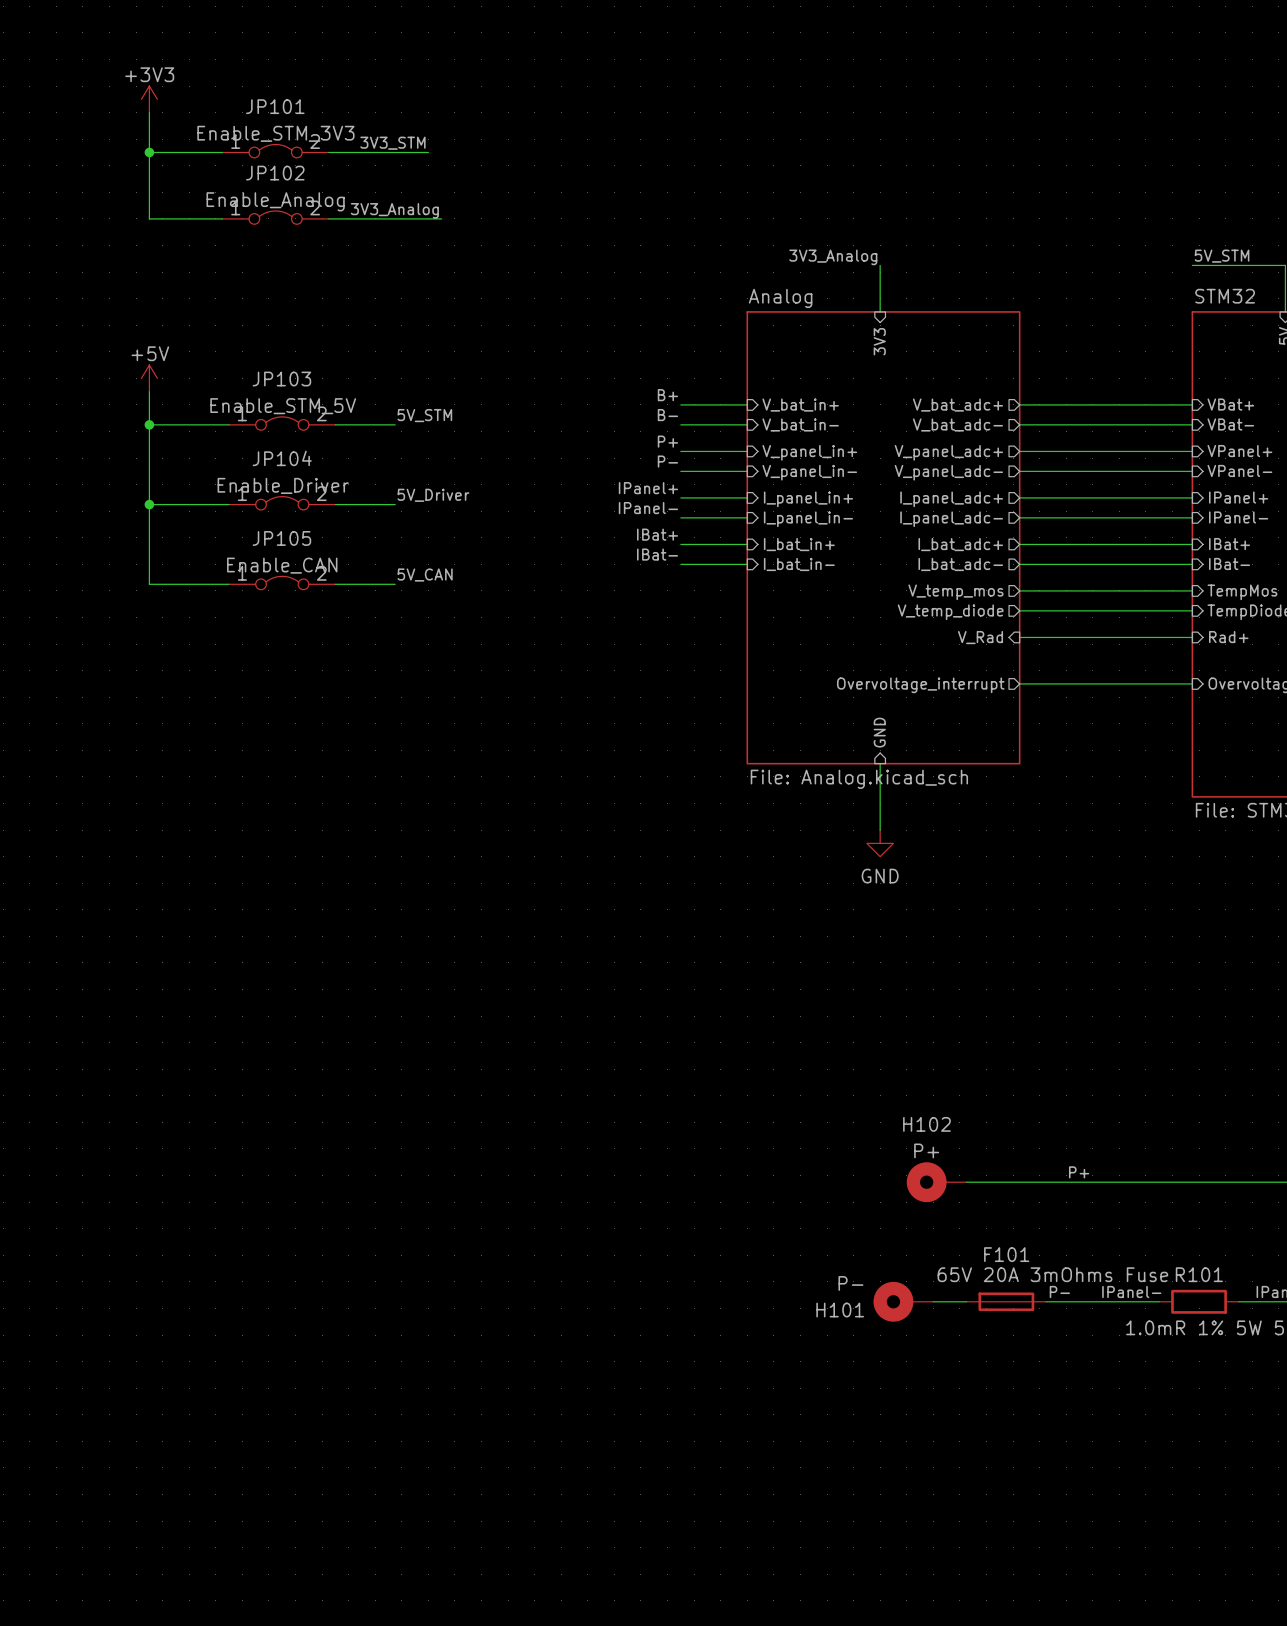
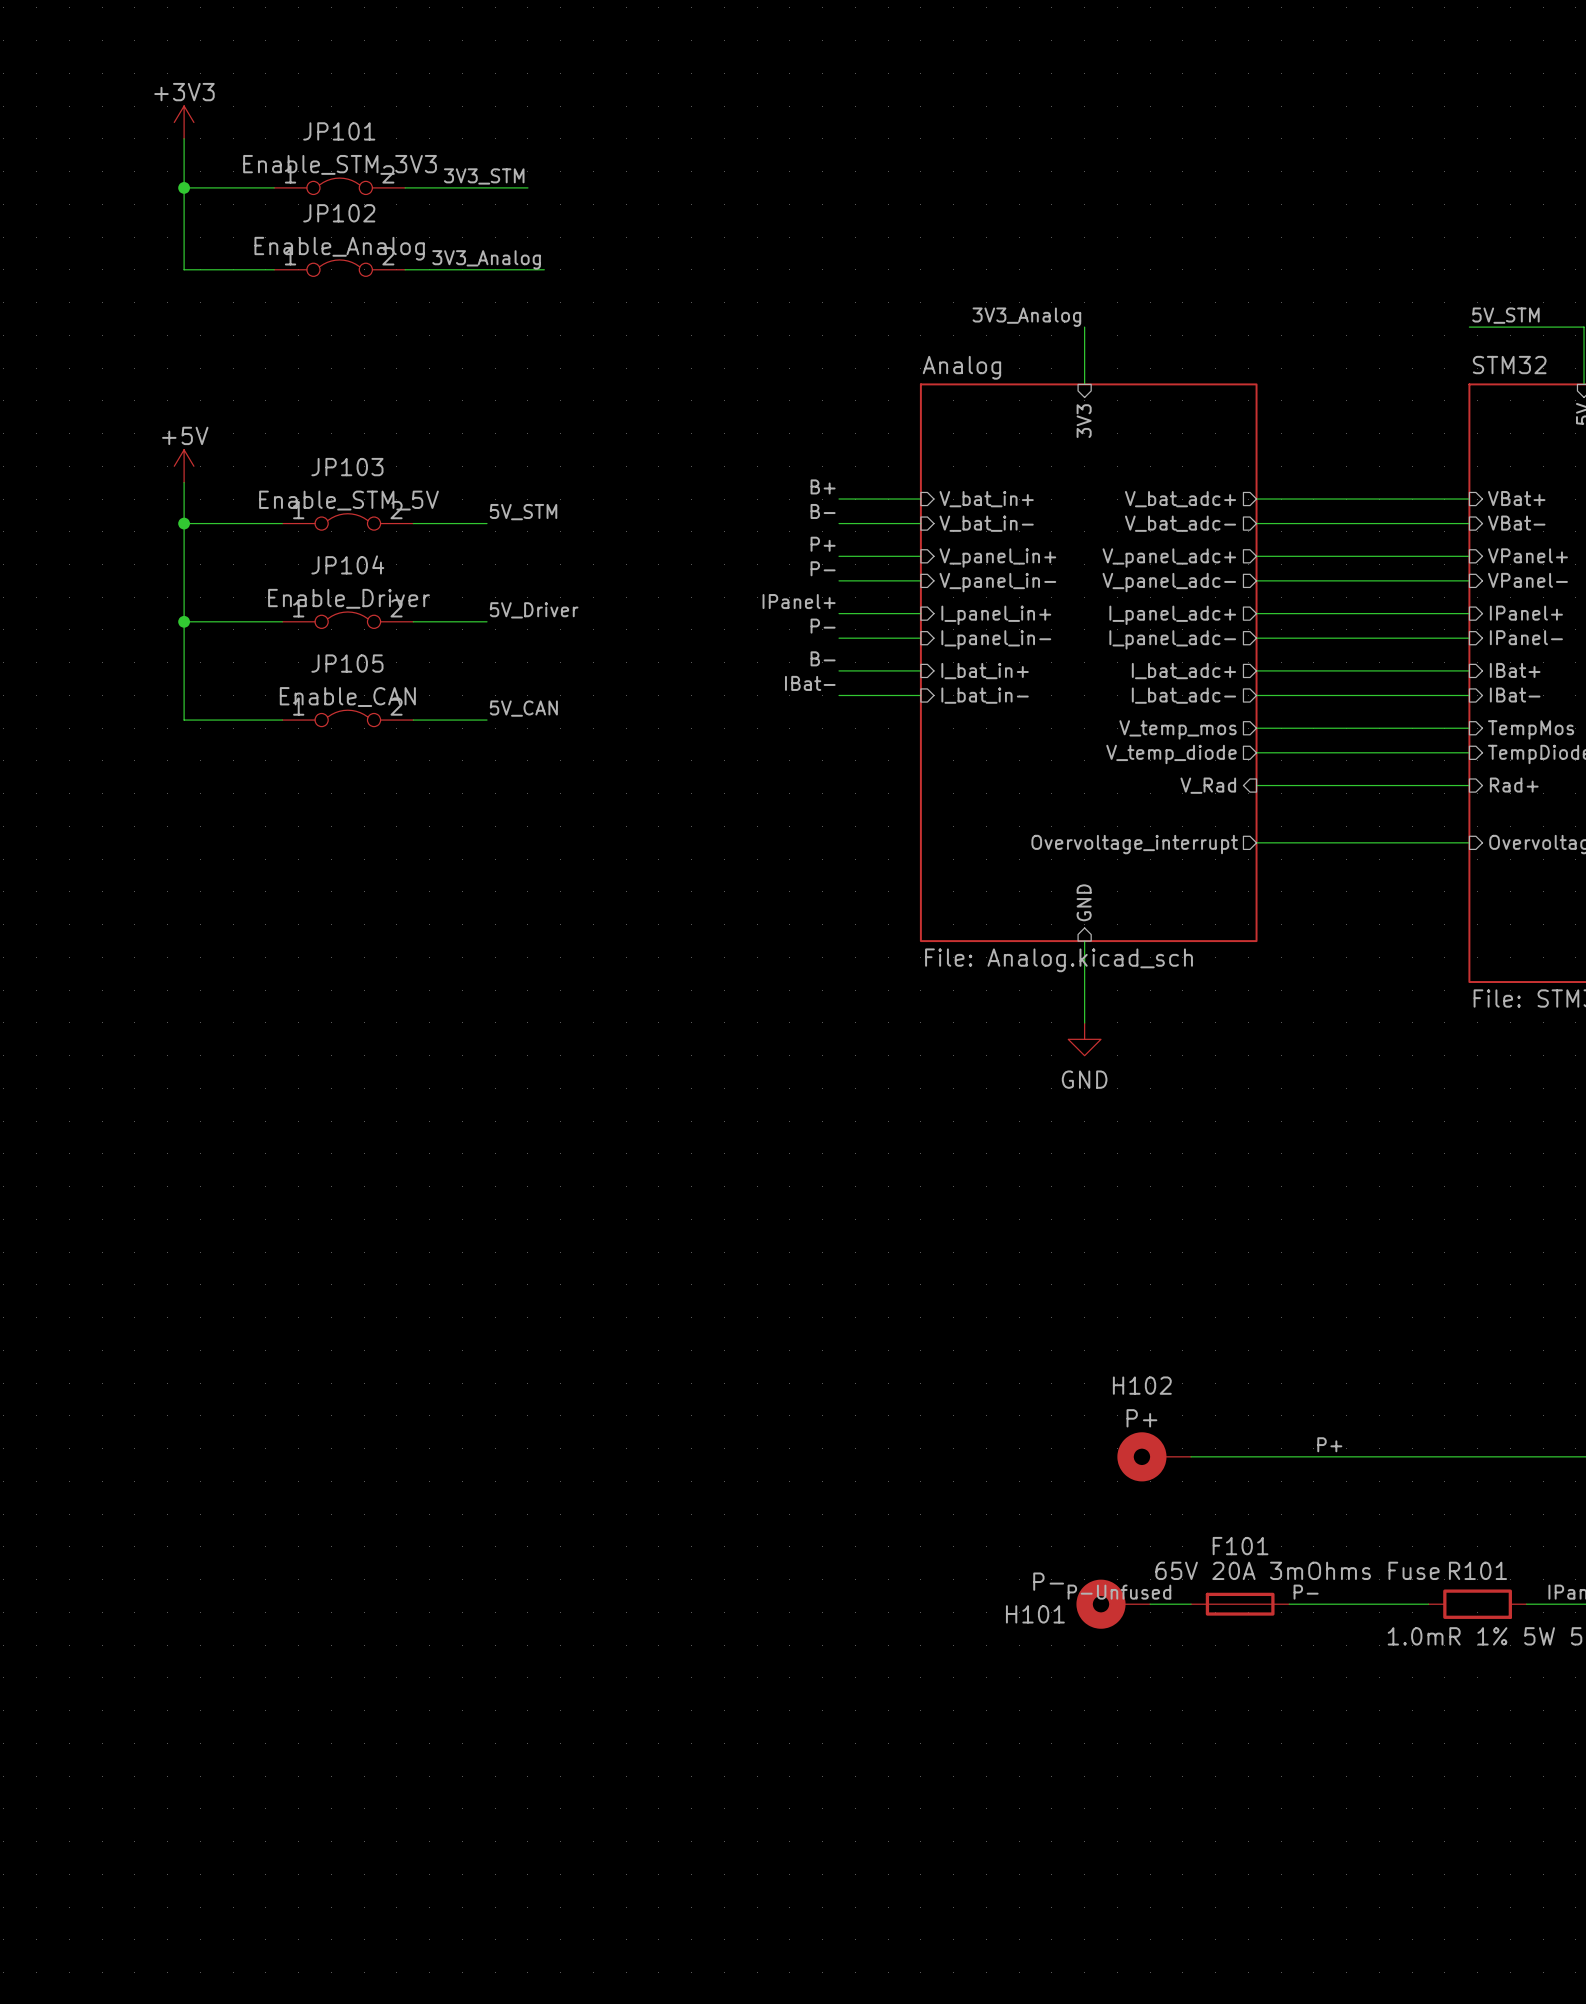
label: IPanel- (648, 508) -> P- (823, 626)
label: IBat+ (657, 534) -> B- (823, 658)
label: none -> P-Unfused (1119, 1592)
label: IPanel- (1131, 1291) -> none

